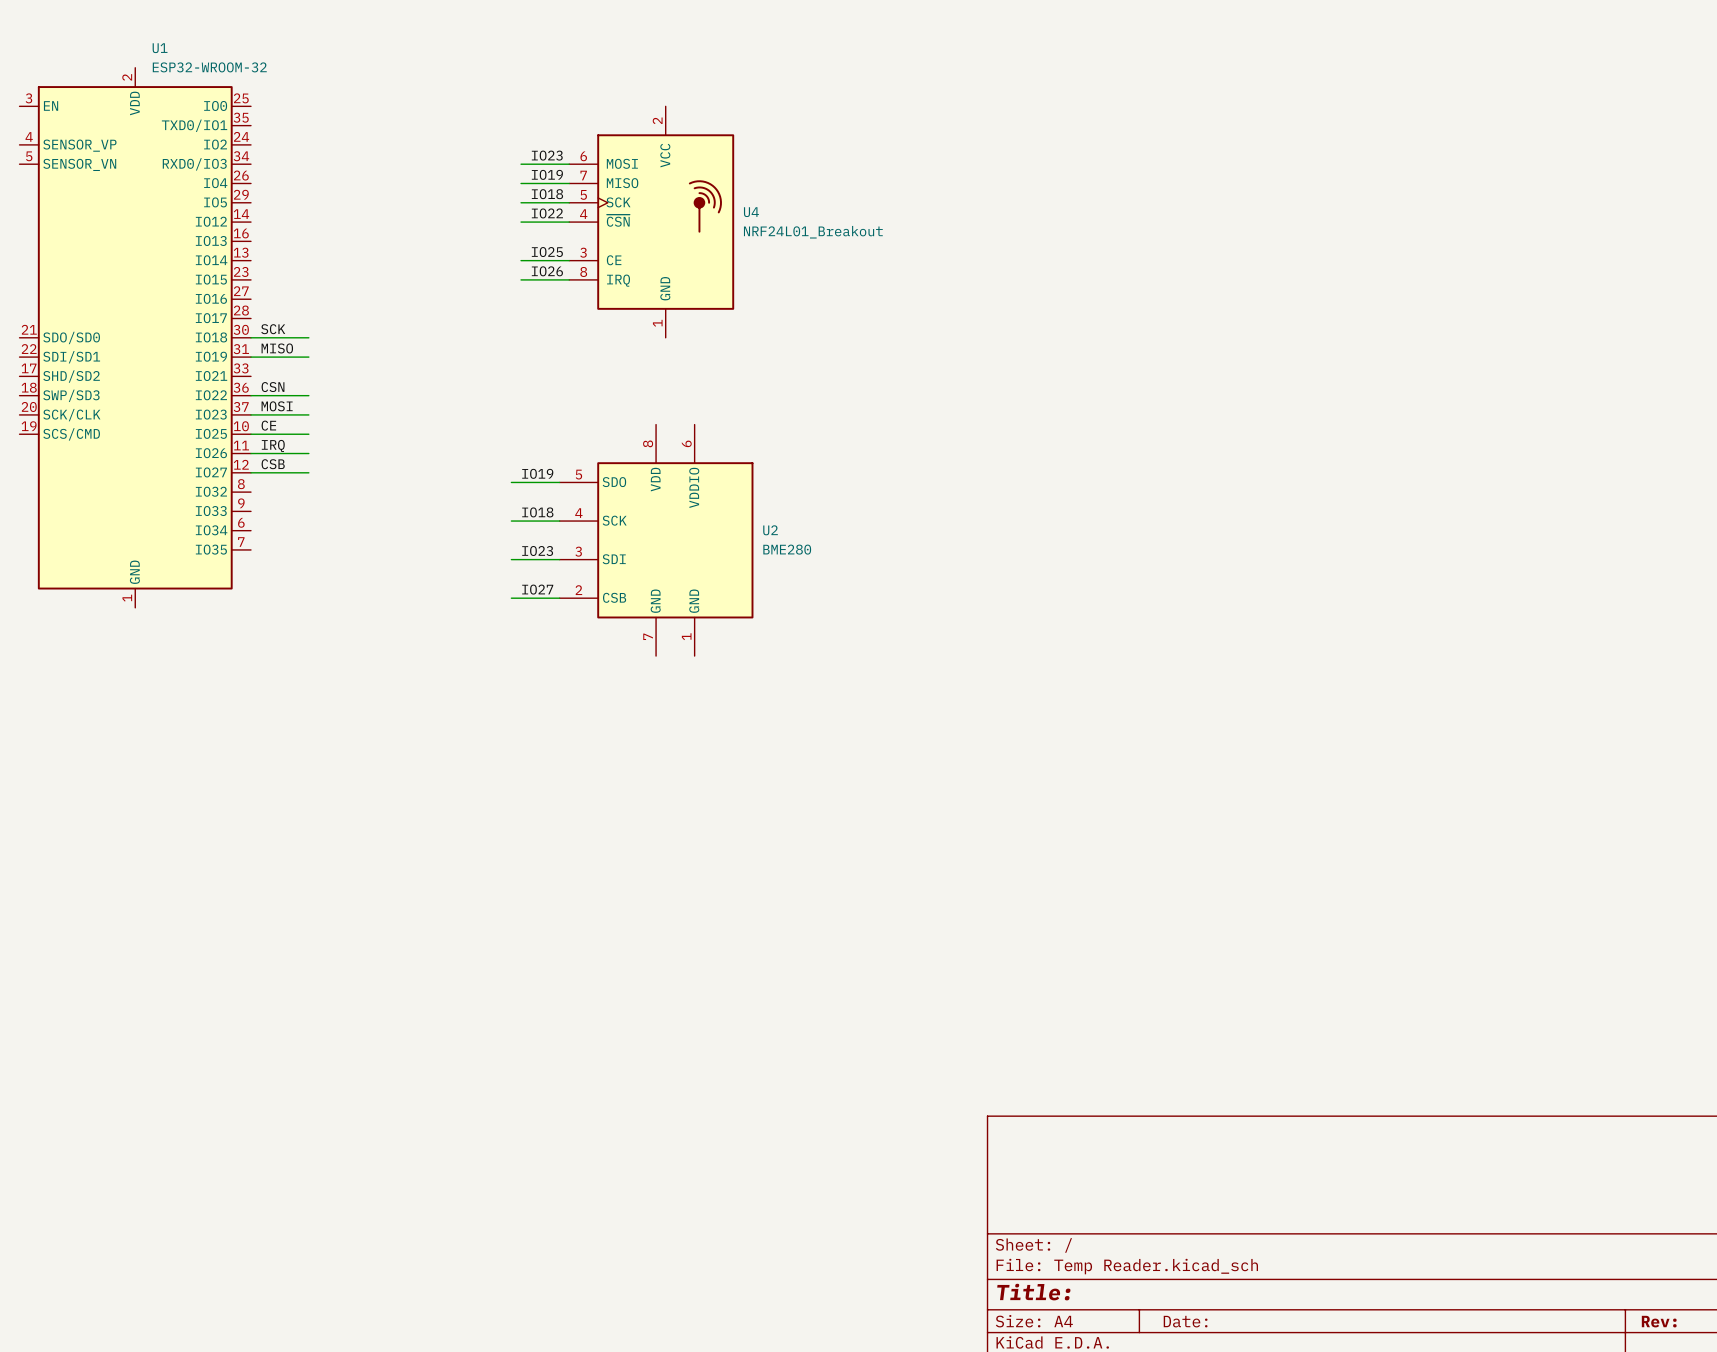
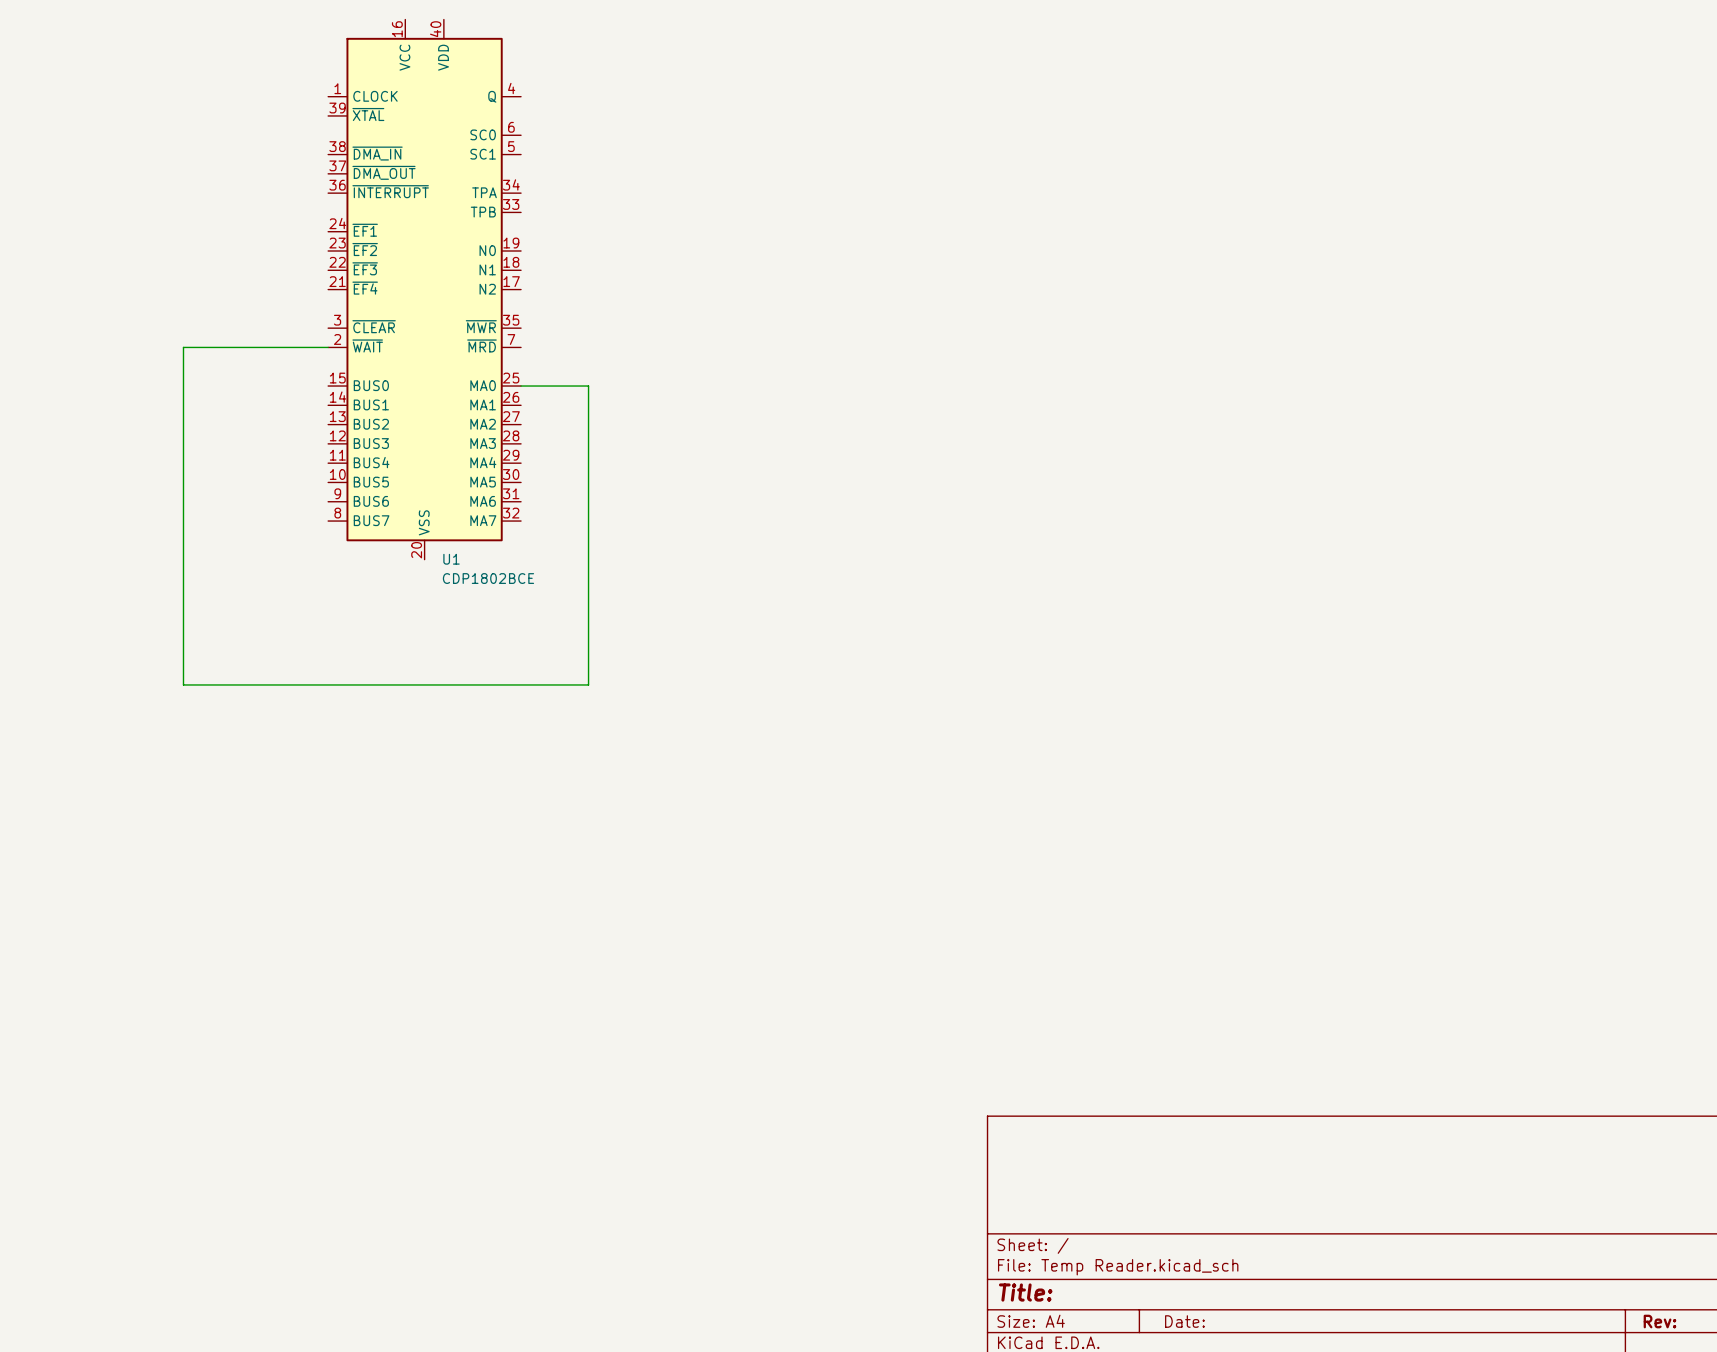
U1 name position: U1 (160, 48) -> U1 (451, 559)
U1 symbol: [19, 67, 251, 608] -> [328, 19, 522, 560]
U1 value: ESP32-WROOM-32 (209, 67) -> CDP1802BCE (488, 578)
label: IO23 (547, 155) -> none
wire: (521, 164) (569, 164) -> none
label: IO19 (547, 174) -> none
wire: (521, 183) (569, 183) -> none
label: IO18 (547, 194) -> none
wire: (521, 202) (569, 202) -> none
label: IO22 (547, 213) -> none
wire: (521, 222) (569, 222) -> none
U4: NRF24L01_Breakout (651, 222) -> none
label: IO25 (547, 252) -> none
wire: (521, 260) (569, 260) -> none
label: IO26 (547, 271) -> none
wire: (521, 279) (569, 279) -> none
label: SCK (273, 329) -> none
wire: (250, 337) (308, 337) -> none
wire: none -> (328, 347) (183, 347) (183, 684) (588, 684) (588, 386) (521, 386)
label: MISO (277, 348) -> none
wire: (250, 357) (308, 357) -> none
label: CSN (273, 387) -> none
wire: (250, 395) (308, 395) -> none
label: MOSI (277, 406) -> none
wire: (250, 414) (308, 414) -> none
label: CE (268, 425) -> none
wire: (250, 434) (308, 434) -> none
label: IRQ (273, 445) -> none
wire: (250, 453) (308, 453) -> none
label: CSB (273, 464) -> none
wire: (250, 472) (308, 472) -> none
label: IO19 (537, 473) -> none
wire: (511, 482) (559, 482) -> none
label: IO18 (537, 512) -> none
wire: (511, 521) (559, 521) -> none
U2: BME280 (656, 540) -> none
label: IO23 (537, 551) -> none
wire: (511, 559) (559, 559) -> none
label: IO27 (537, 589) -> none
wire: (511, 598) (559, 598) -> none

